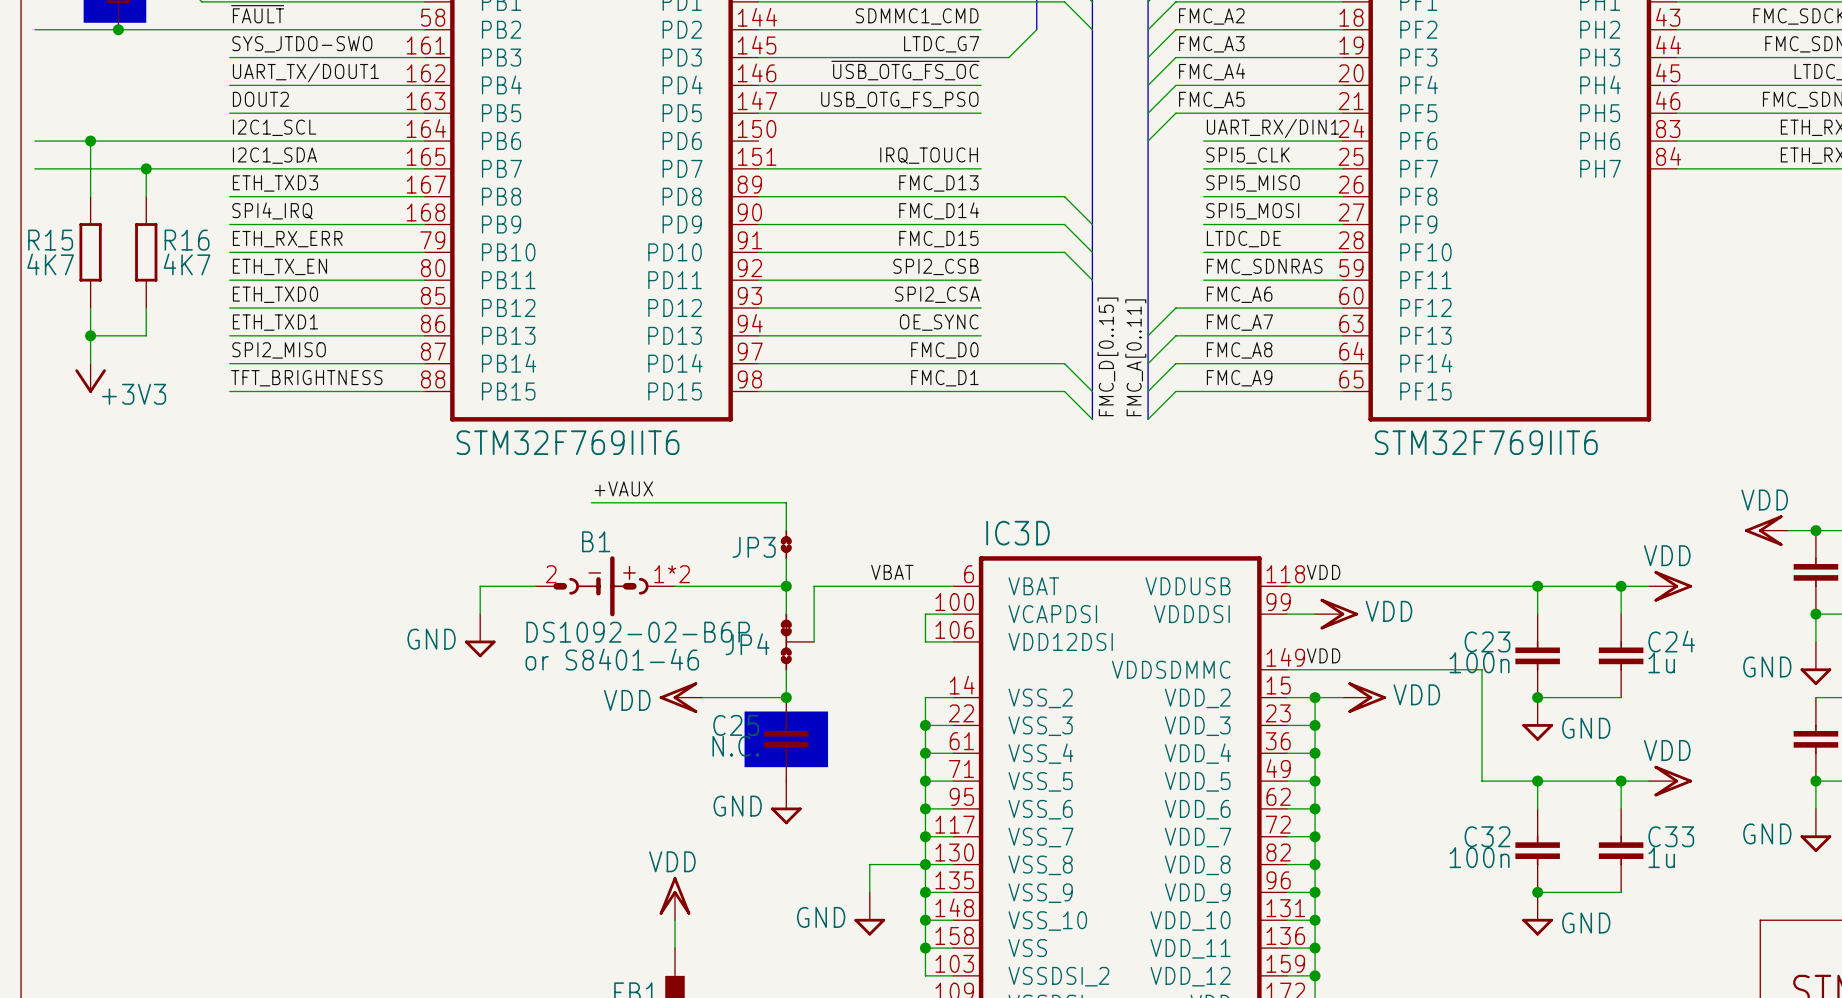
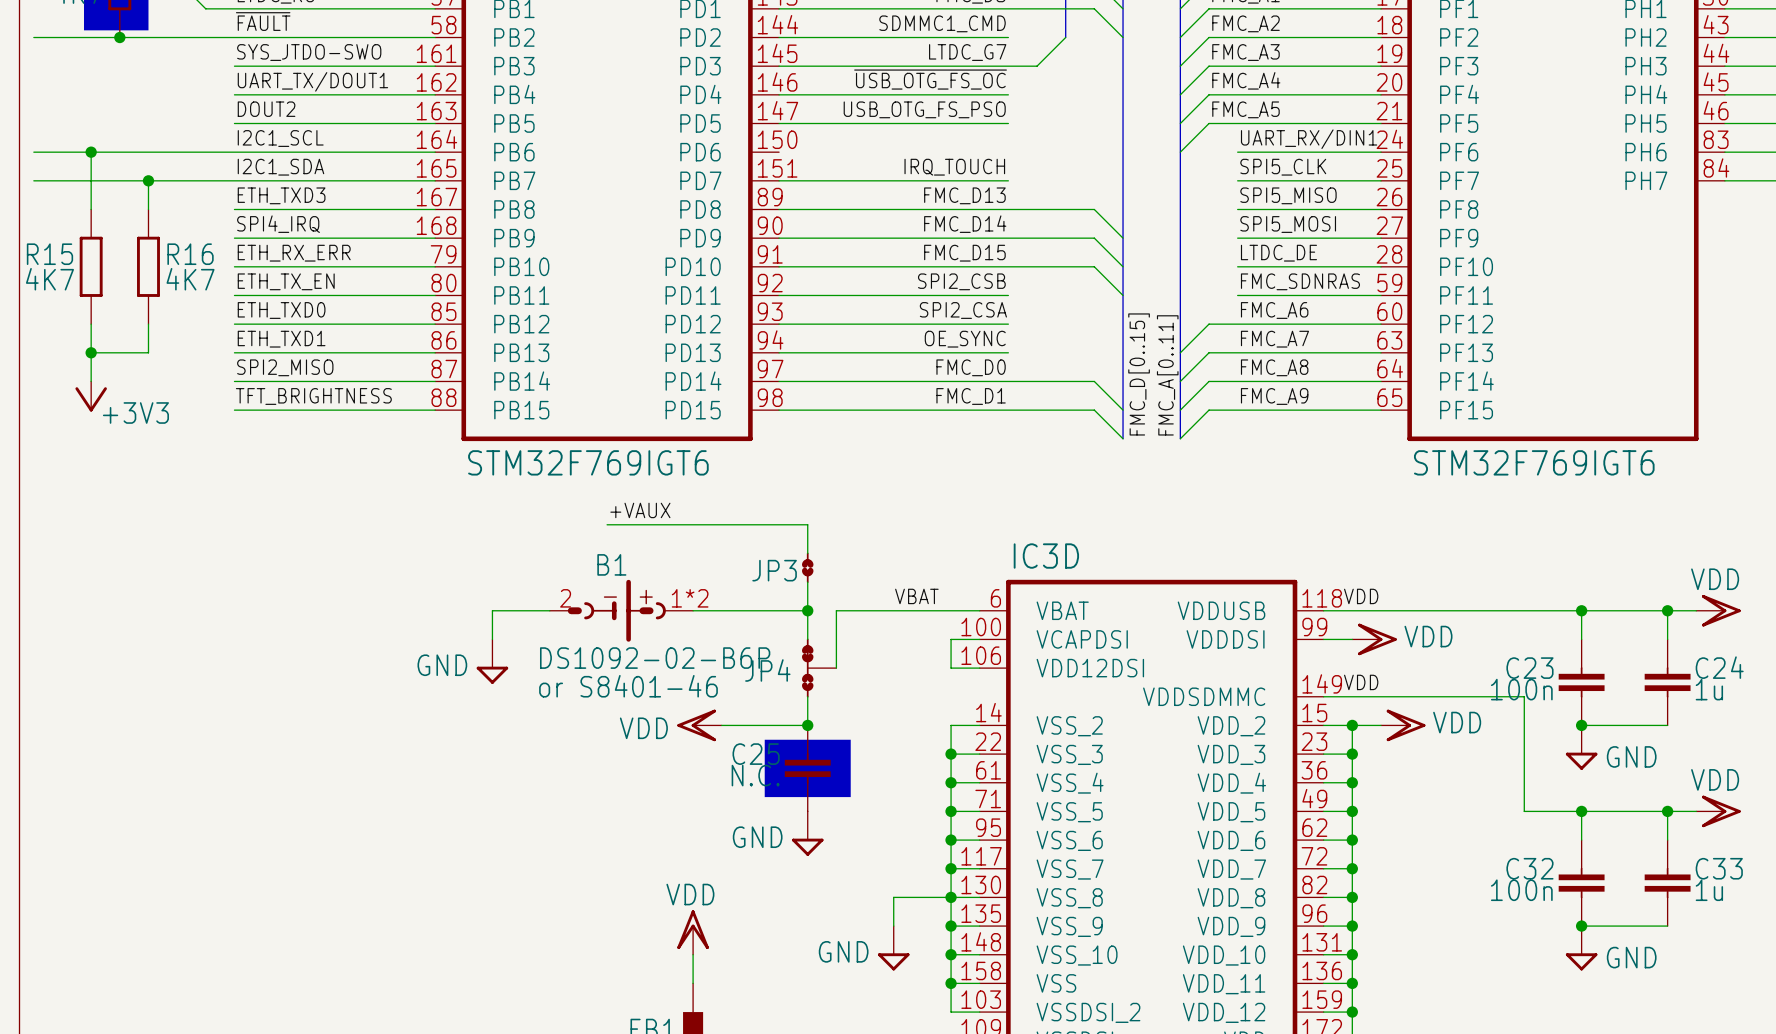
part value: STM32F769IIT6 (567, 442) -> STM32F769IGT6 (588, 462)
part value: STM32F769IIT6 (1486, 442) -> STM32F769IGT6 (1534, 462)

